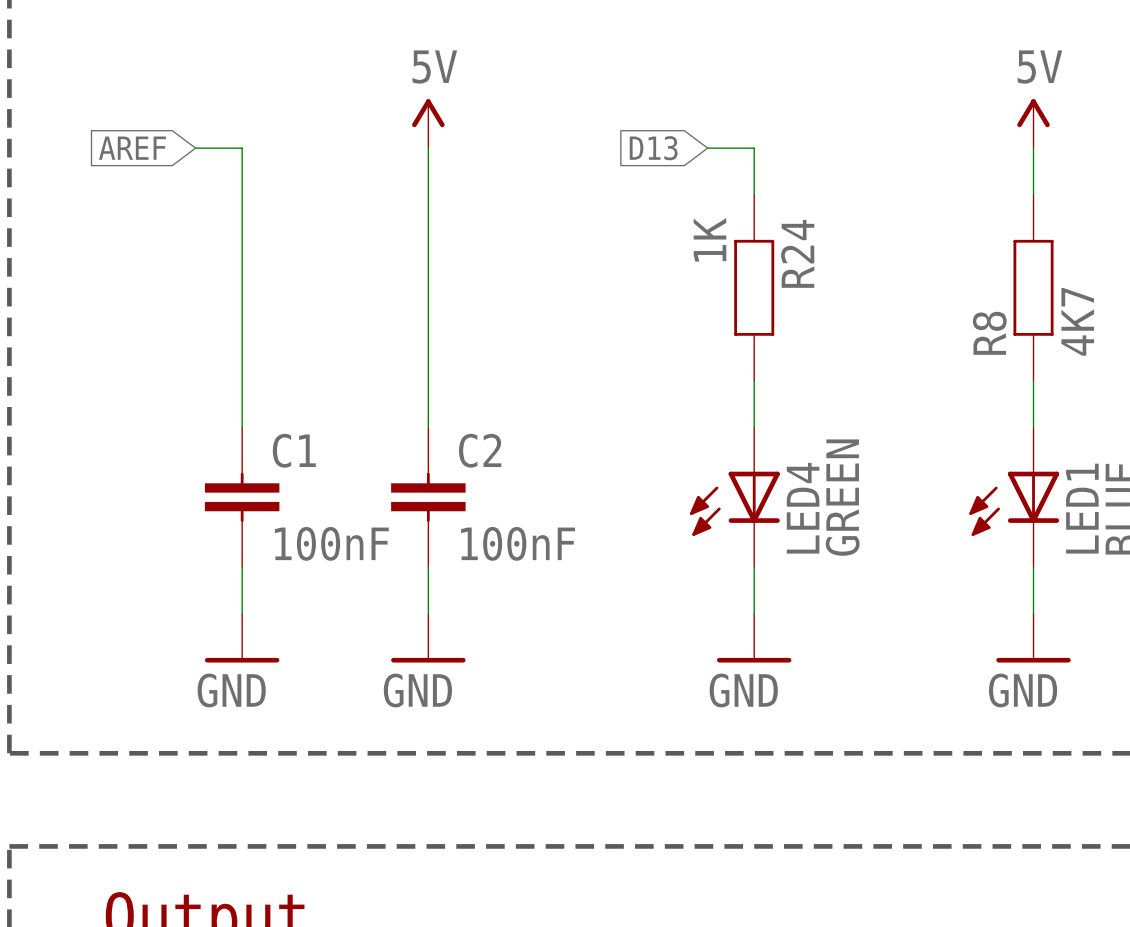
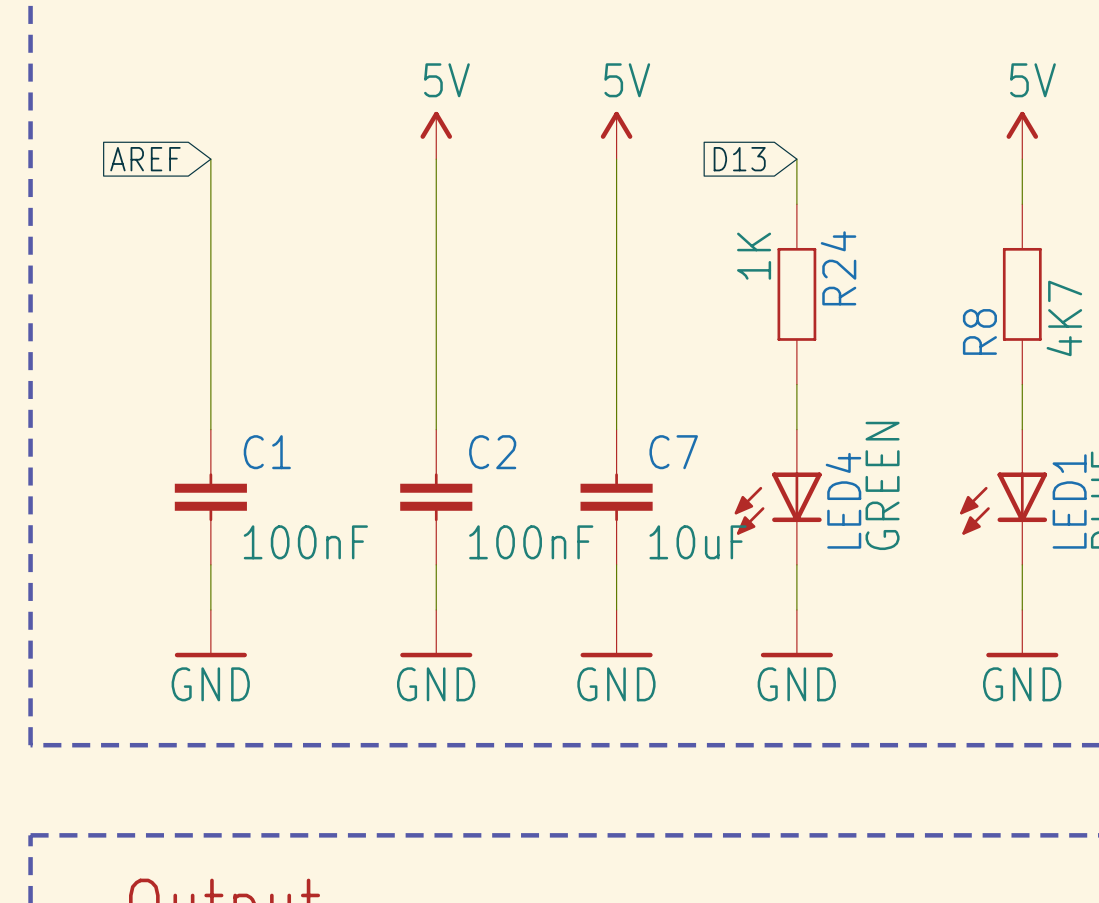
power symbol: none -> 5V (616, 135)
wire: (195, 148) (242, 148) (242, 427) -> (210, 159) (210, 429)
wire: none -> (616, 159) (616, 429)
global label position: D13 (653, 148) -> D13 (739, 159)
wire: (707, 148) (754, 148) (754, 194) -> none
wire: none -> (796, 159) (796, 204)
R24 position: (754, 287) -> (796, 294)
wire: (754, 380) (754, 427) -> (796, 384) (796, 429)
C1 position: (242, 497) -> (210, 497)
C7: none -> 10uF (616, 497)
LED4 position: (734, 497) -> (778, 497)
wire: (242, 567) (242, 613) -> (210, 564) (210, 609)
wire: none -> (616, 564) (616, 609)
wire: (754, 567) (754, 613) -> (796, 564) (796, 609)
power symbol position: GND (242, 638) -> GND (210, 633)
power symbol: none -> GND (616, 633)
power symbol position: GND (754, 638) -> GND (796, 633)

